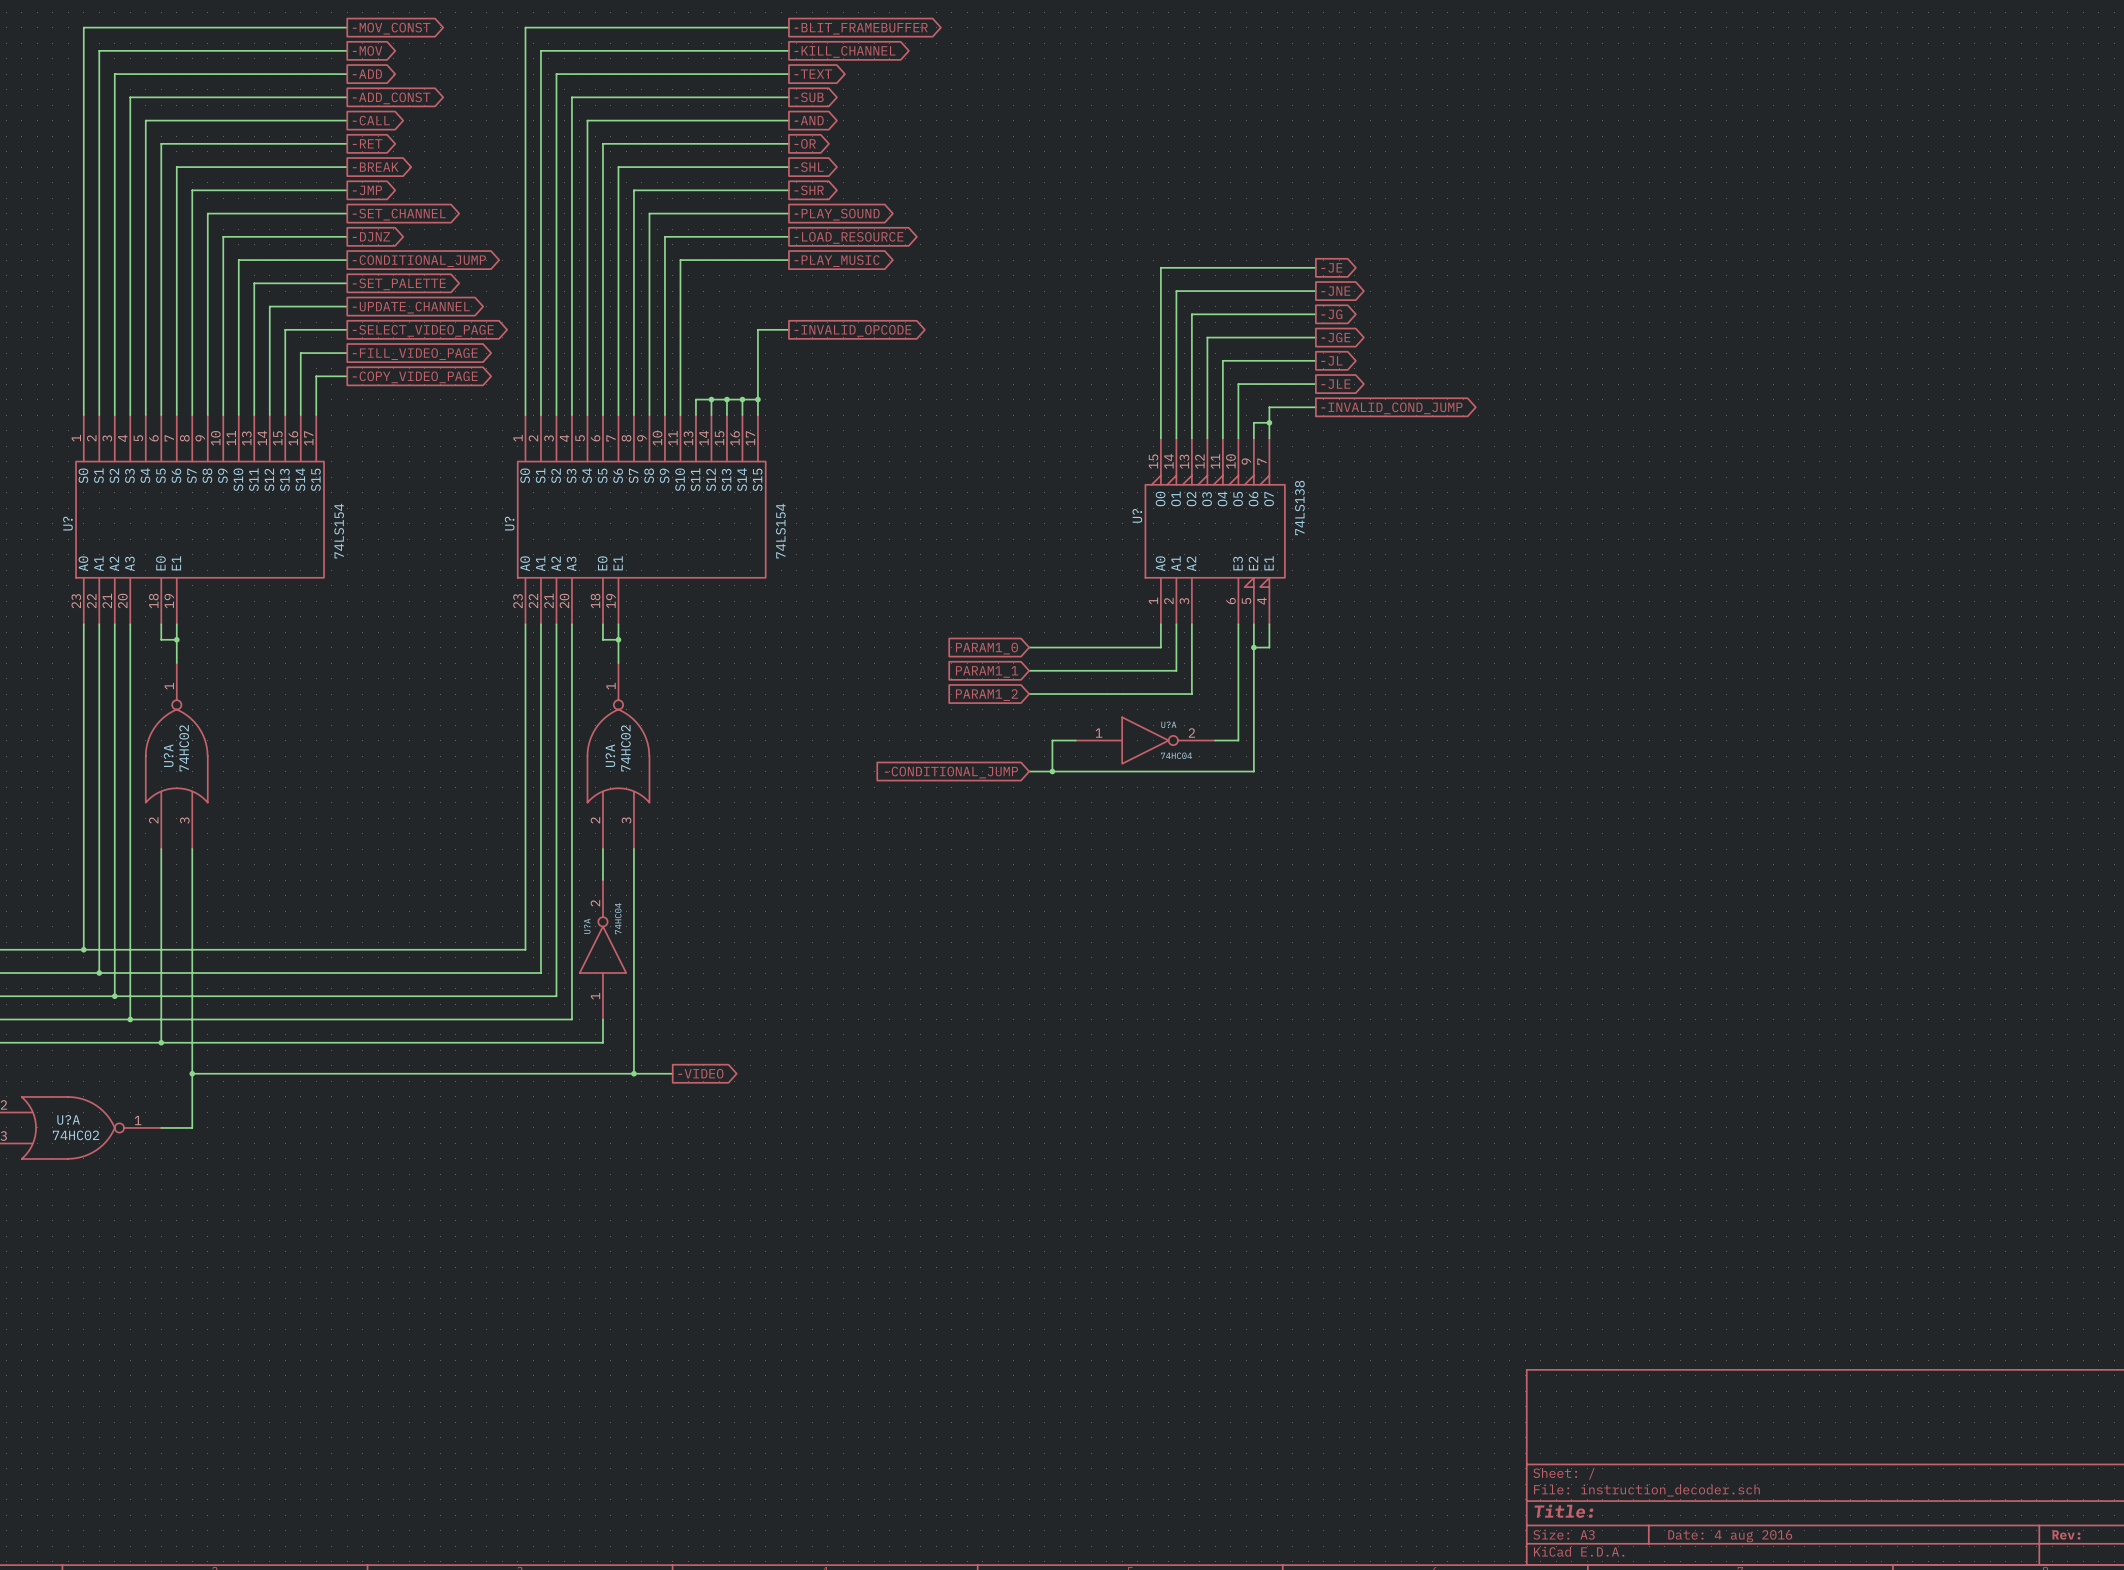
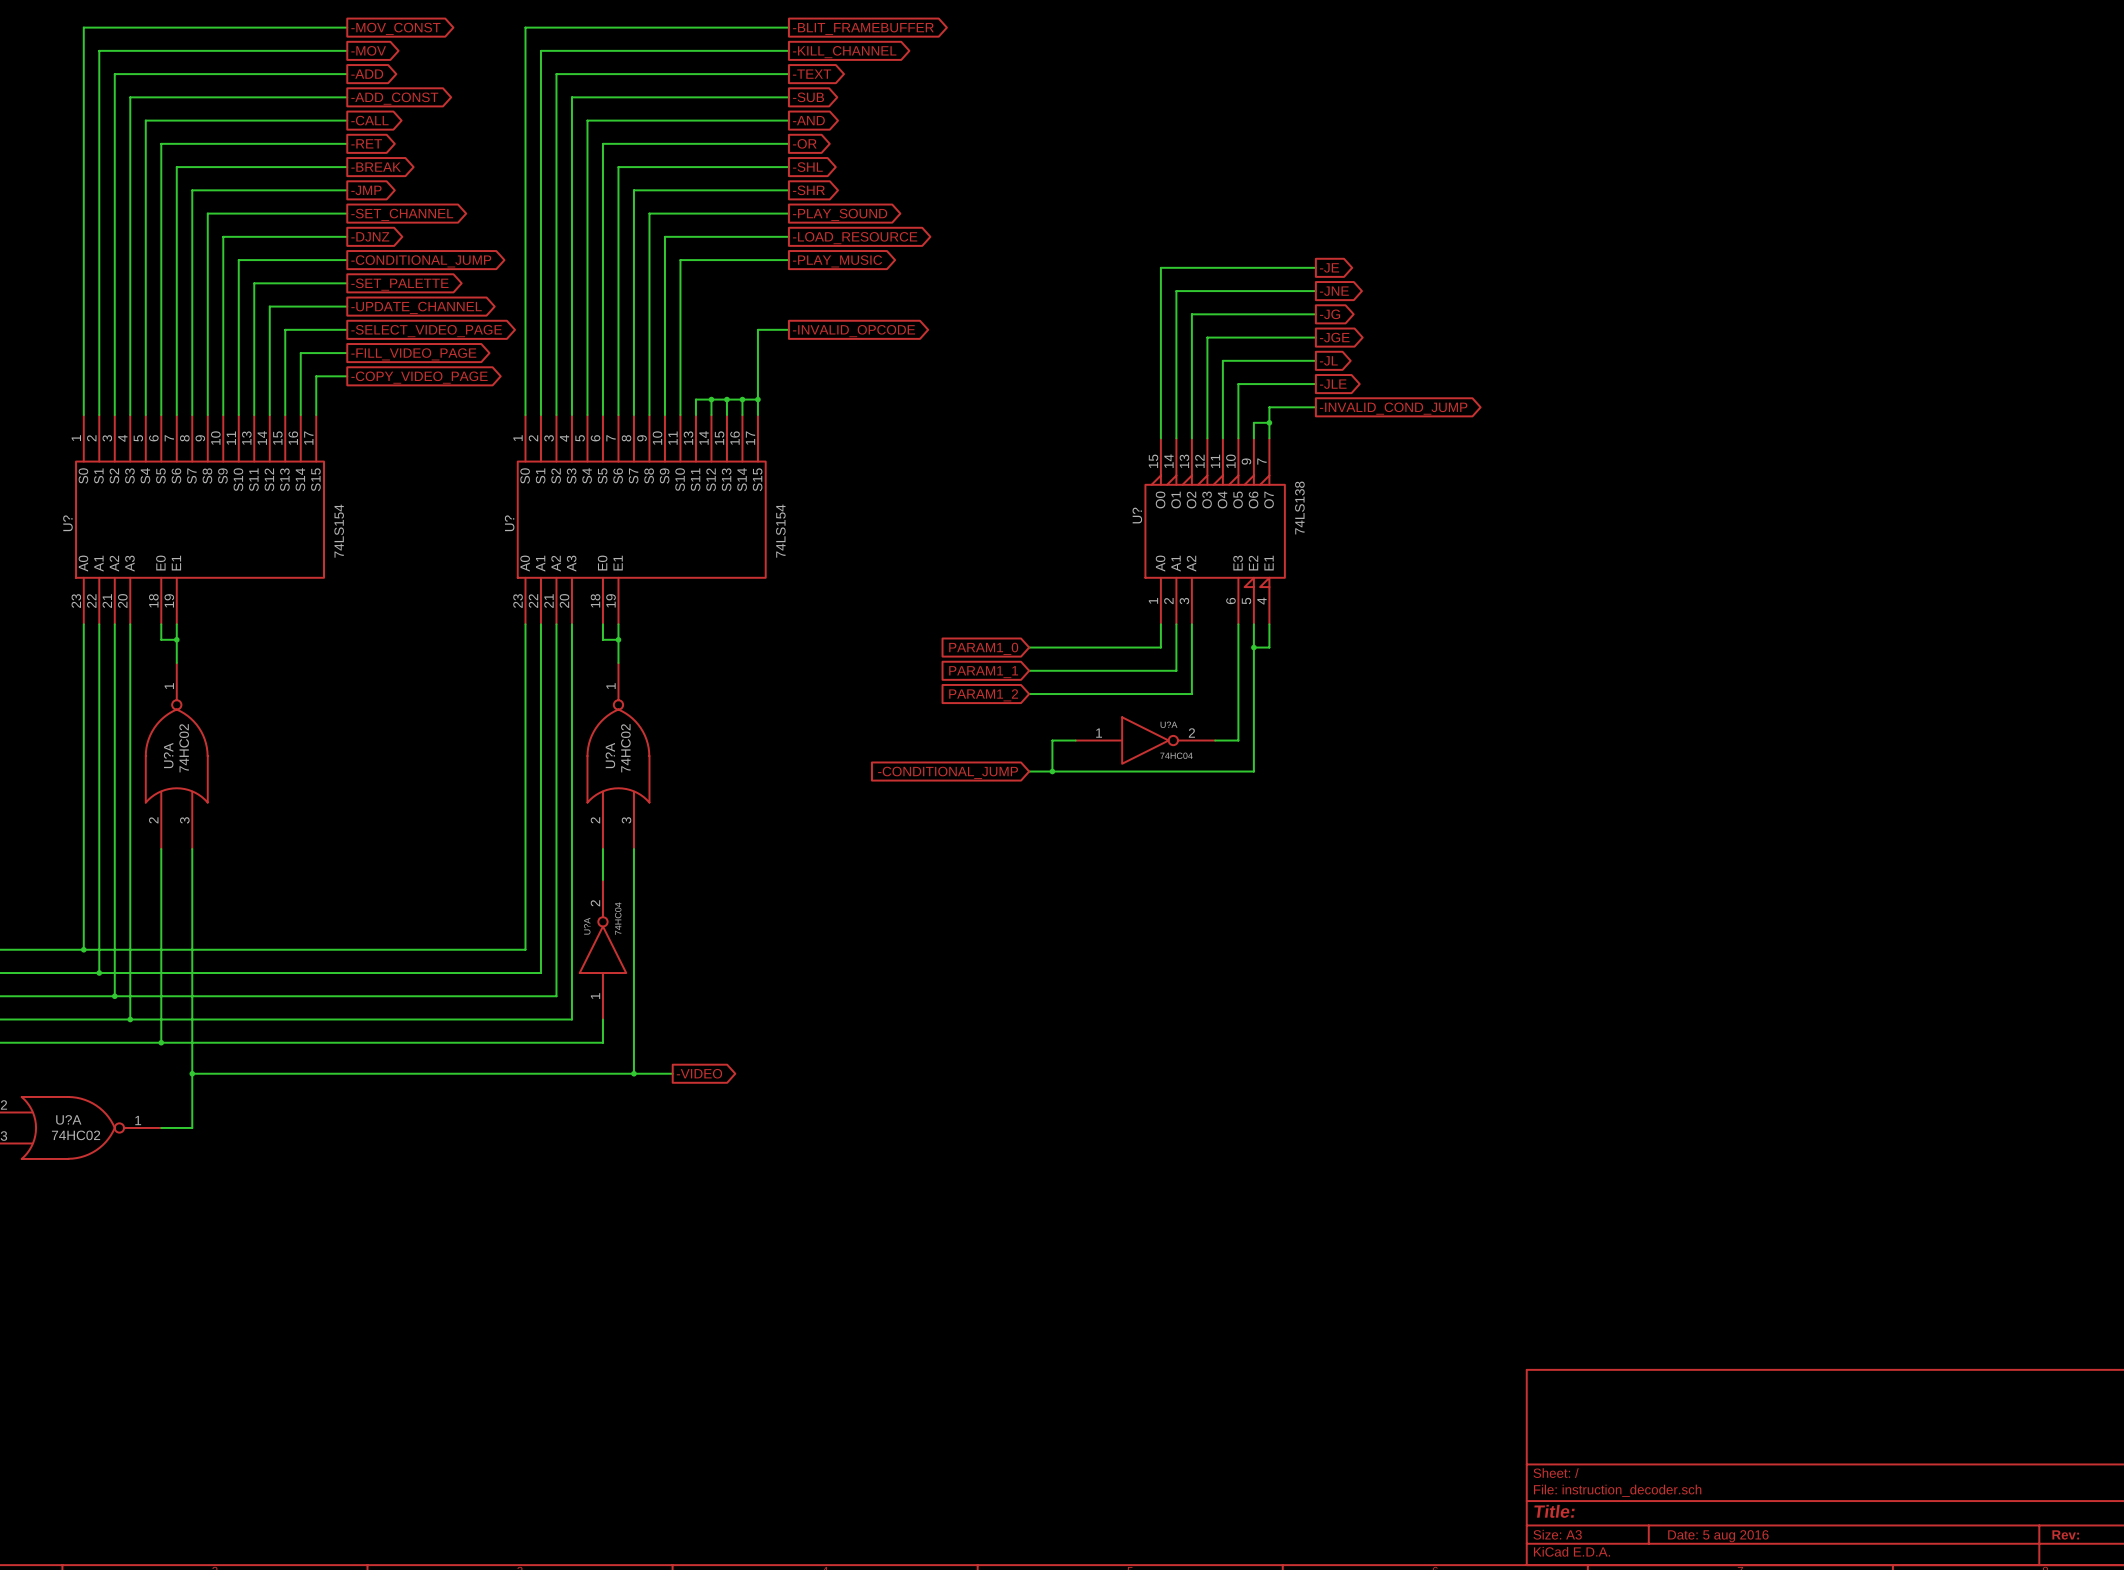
title block: Date: 4 aug 2016 (1730, 1536) -> Date: 5 aug 2016 (1718, 1536)

